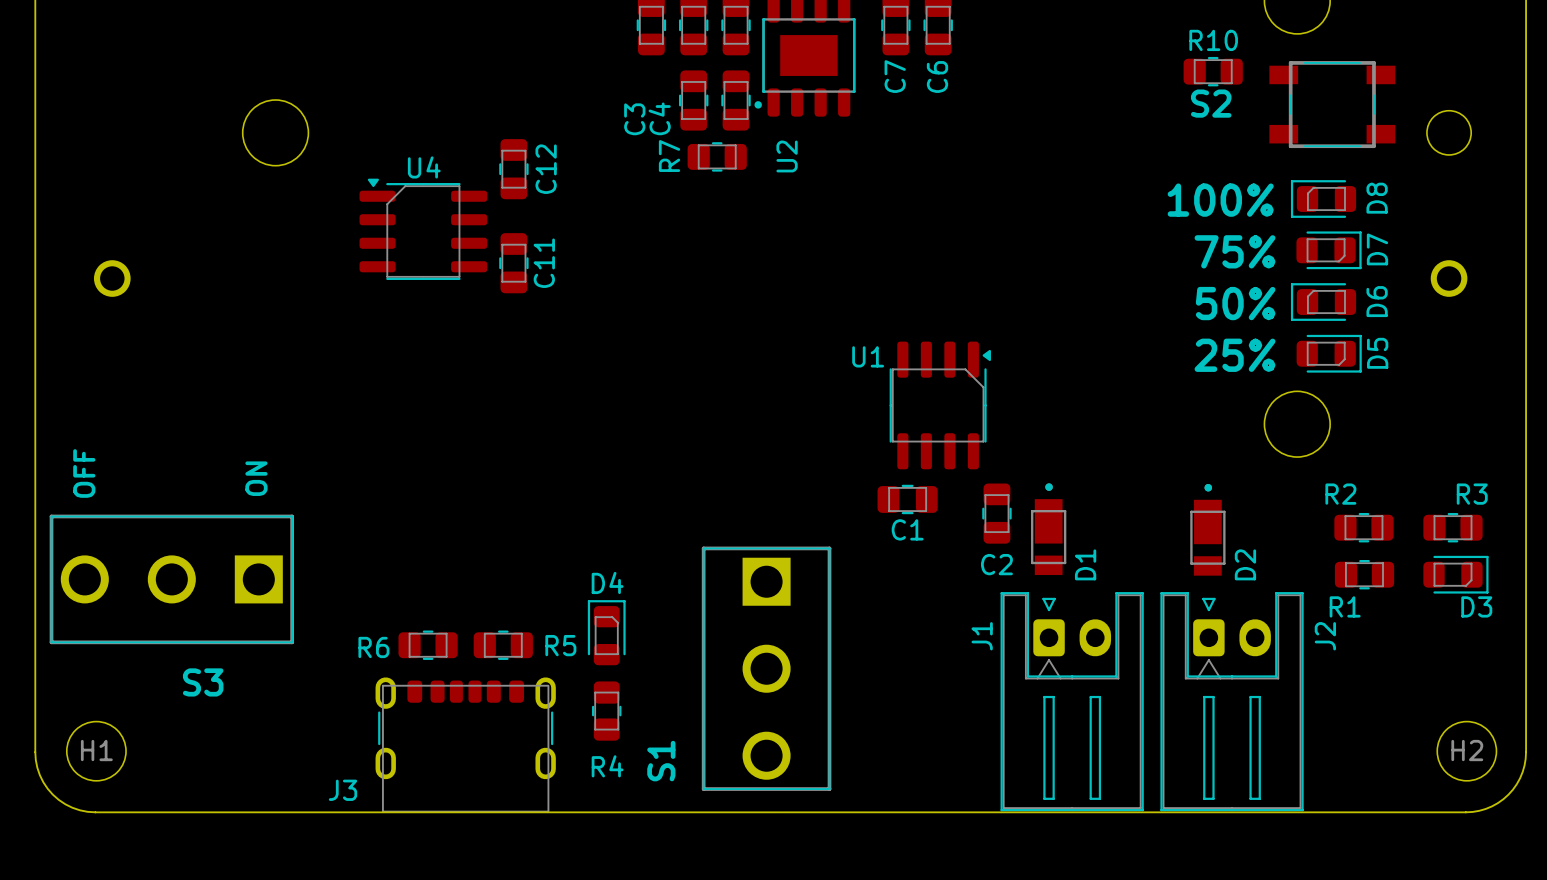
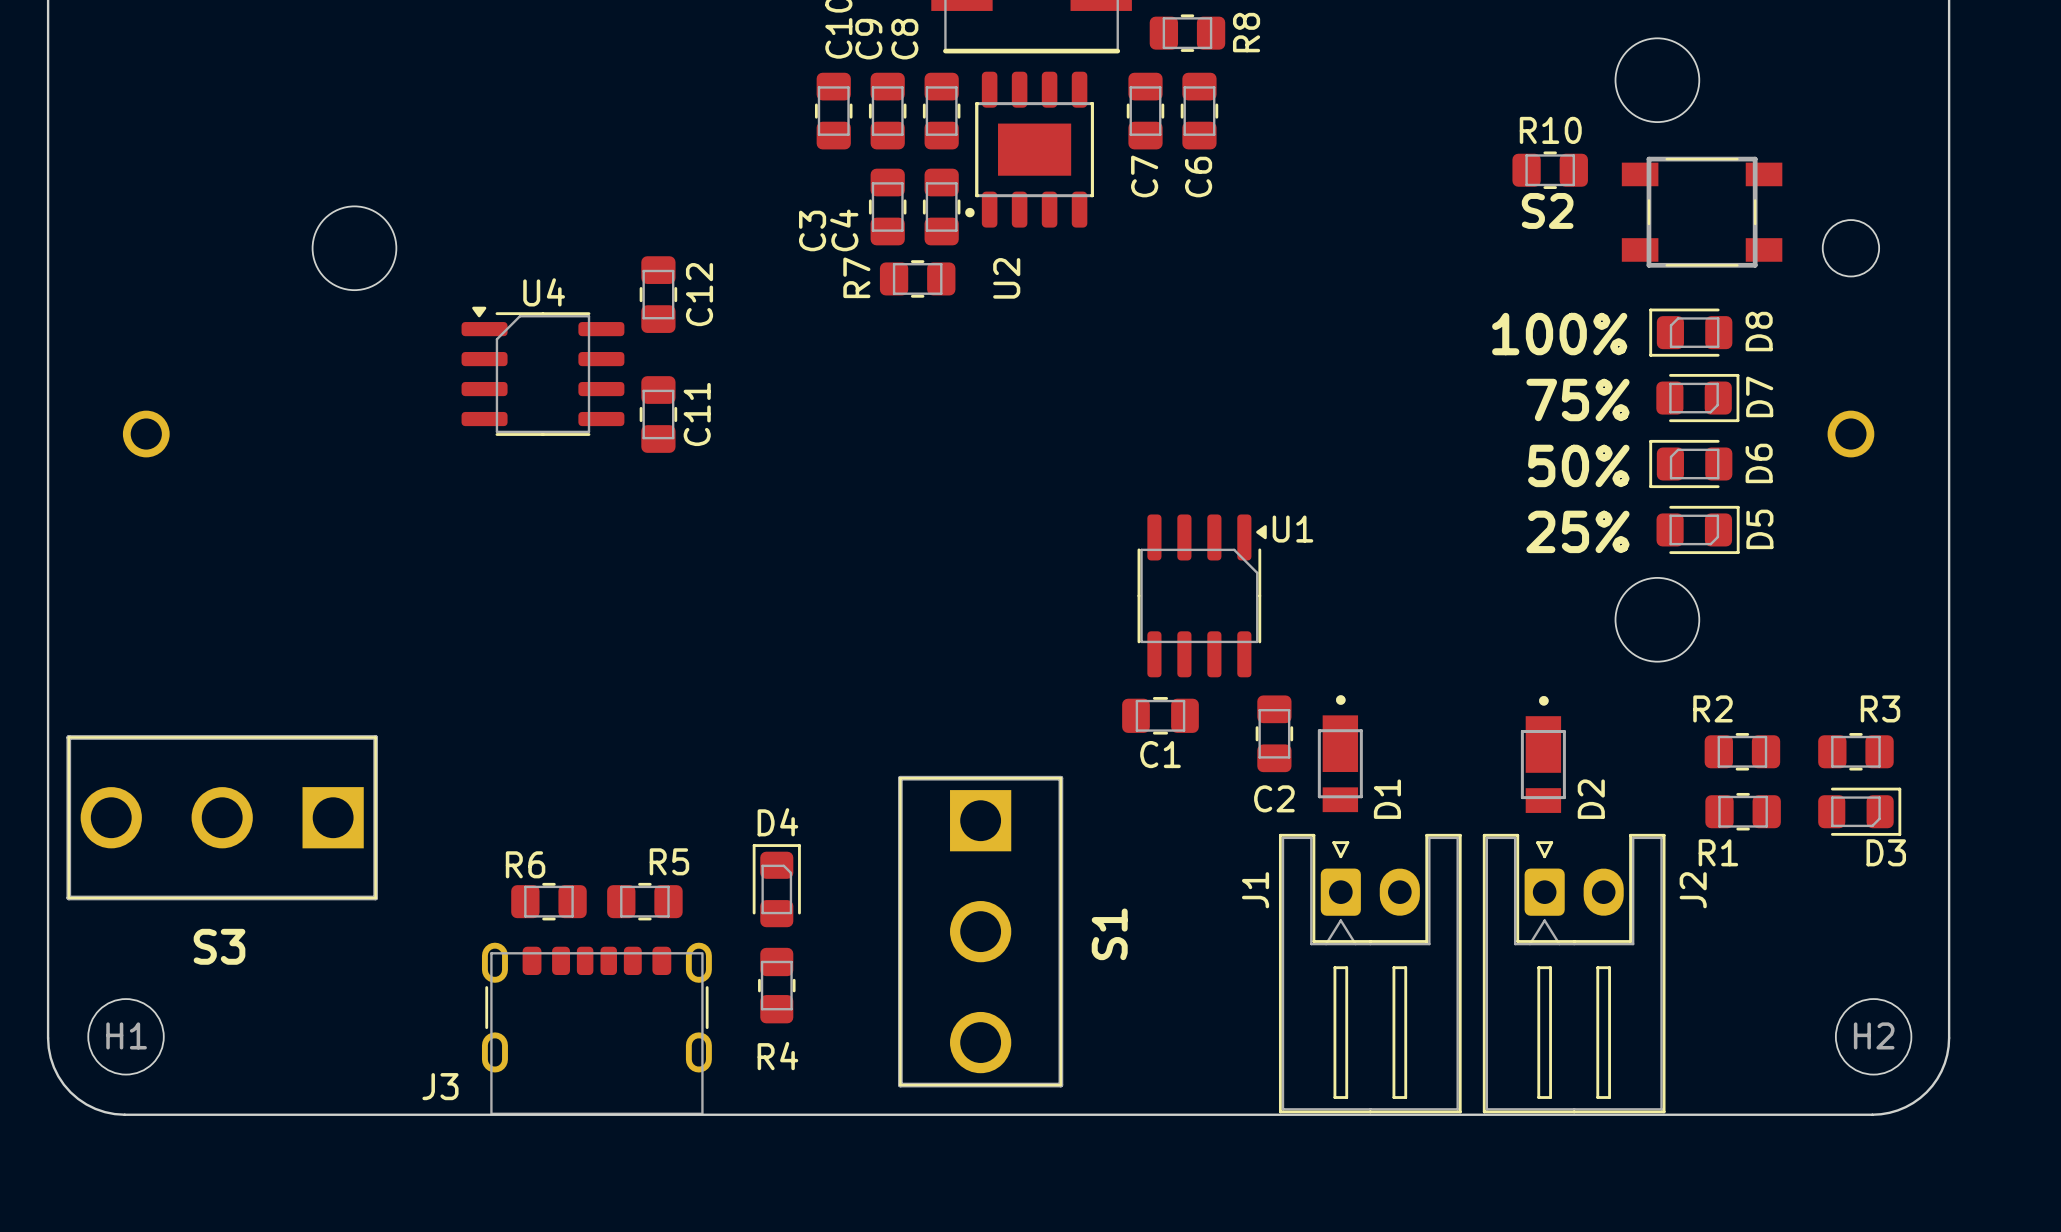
U1 name position: U1 (868, 356) -> U1 (1292, 529)
text: OFF (84, 473) -> none
text: ON (256, 478) -> none
R5 name position: R5 (560, 645) -> R5 (669, 861)
R6 name position: R6 (373, 647) -> R6 (525, 864)
S3 name position: S3 (203, 682) -> S3 (219, 946)
S1 name position: S1 (661, 761) -> S1 (1109, 934)

